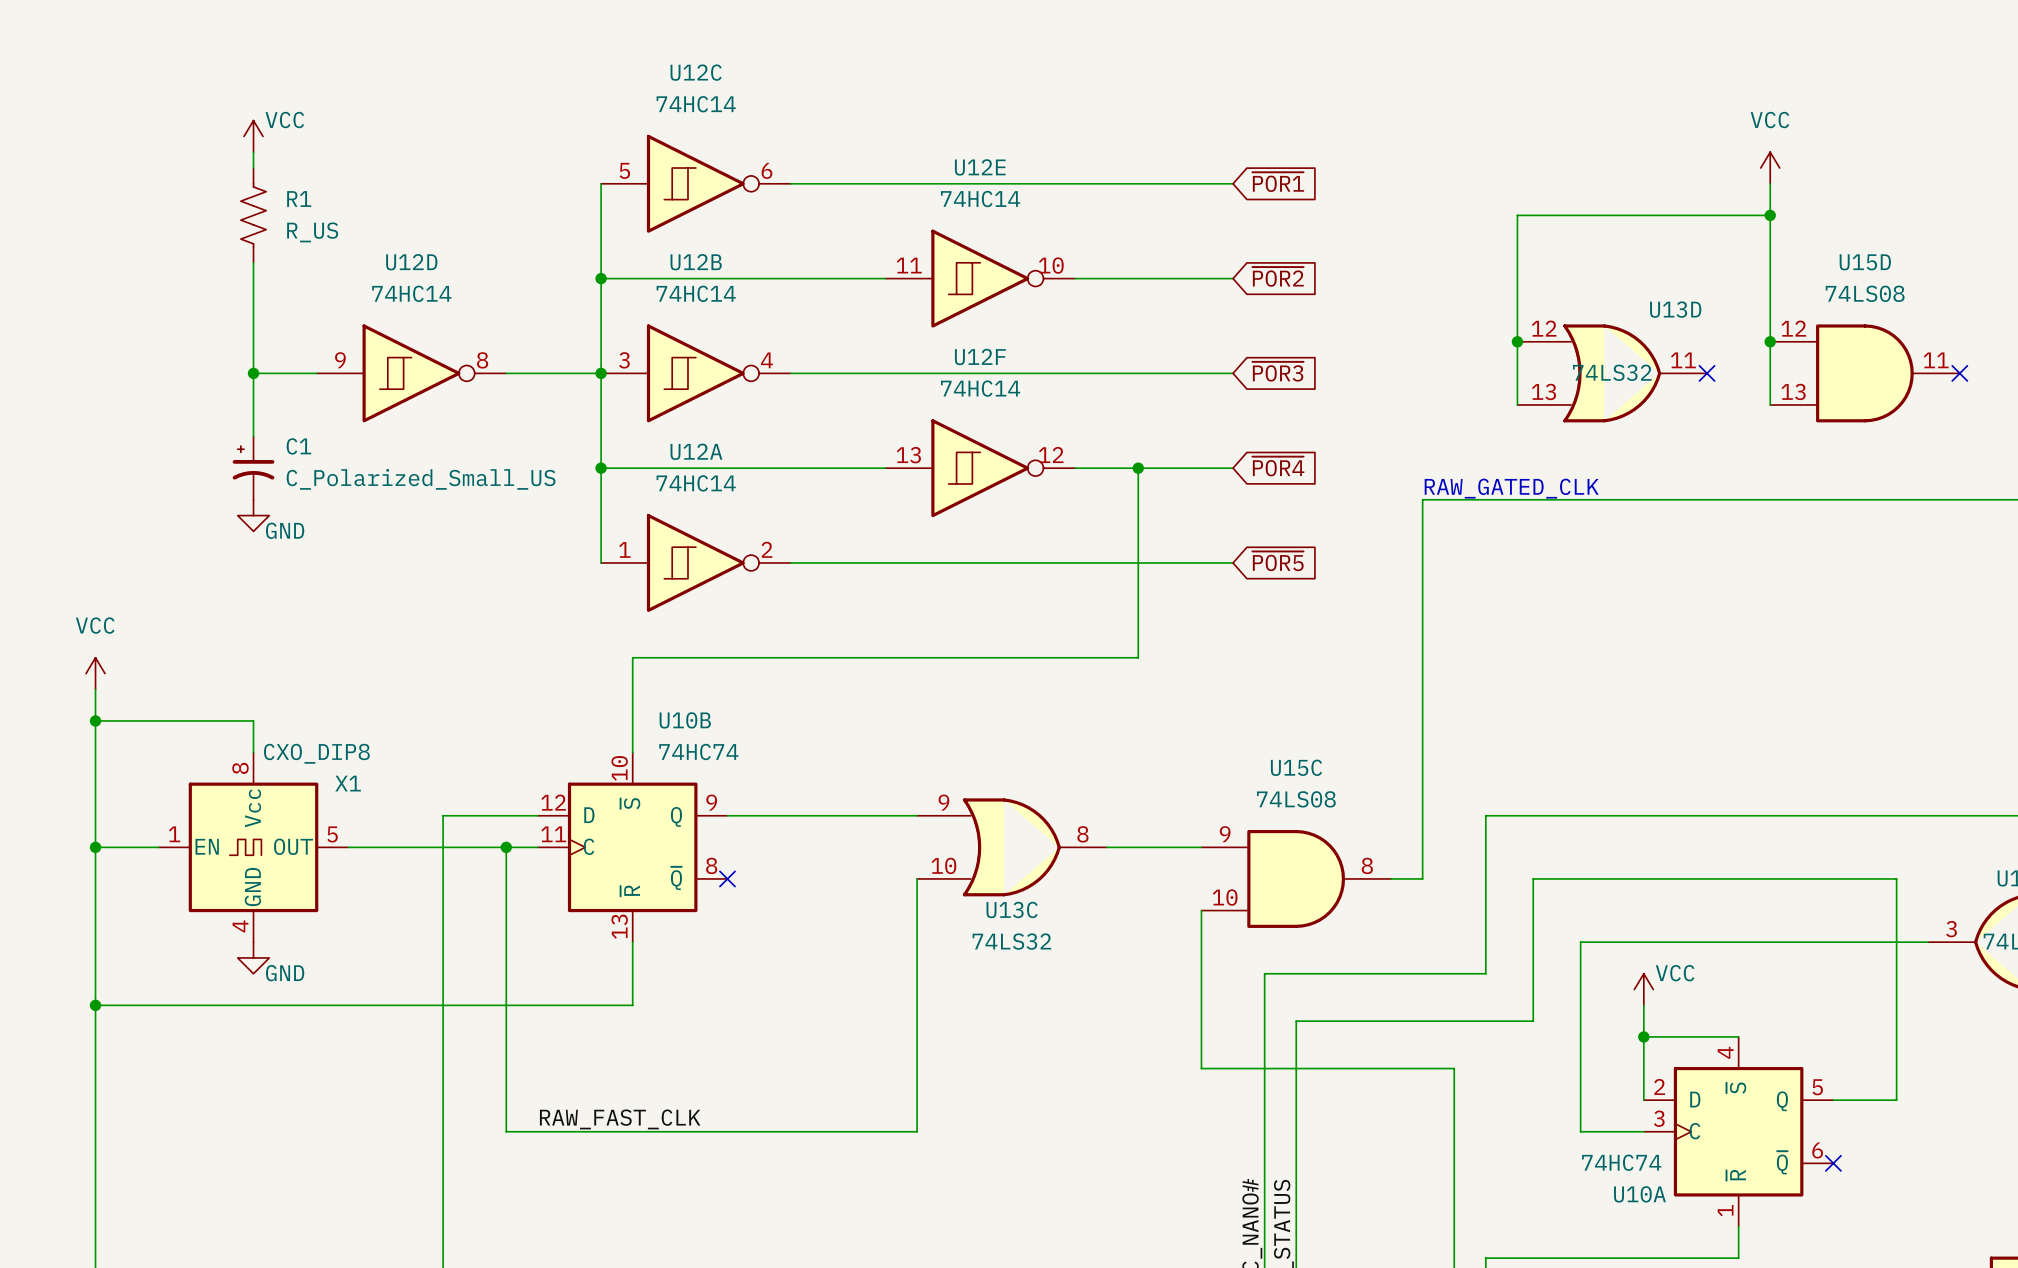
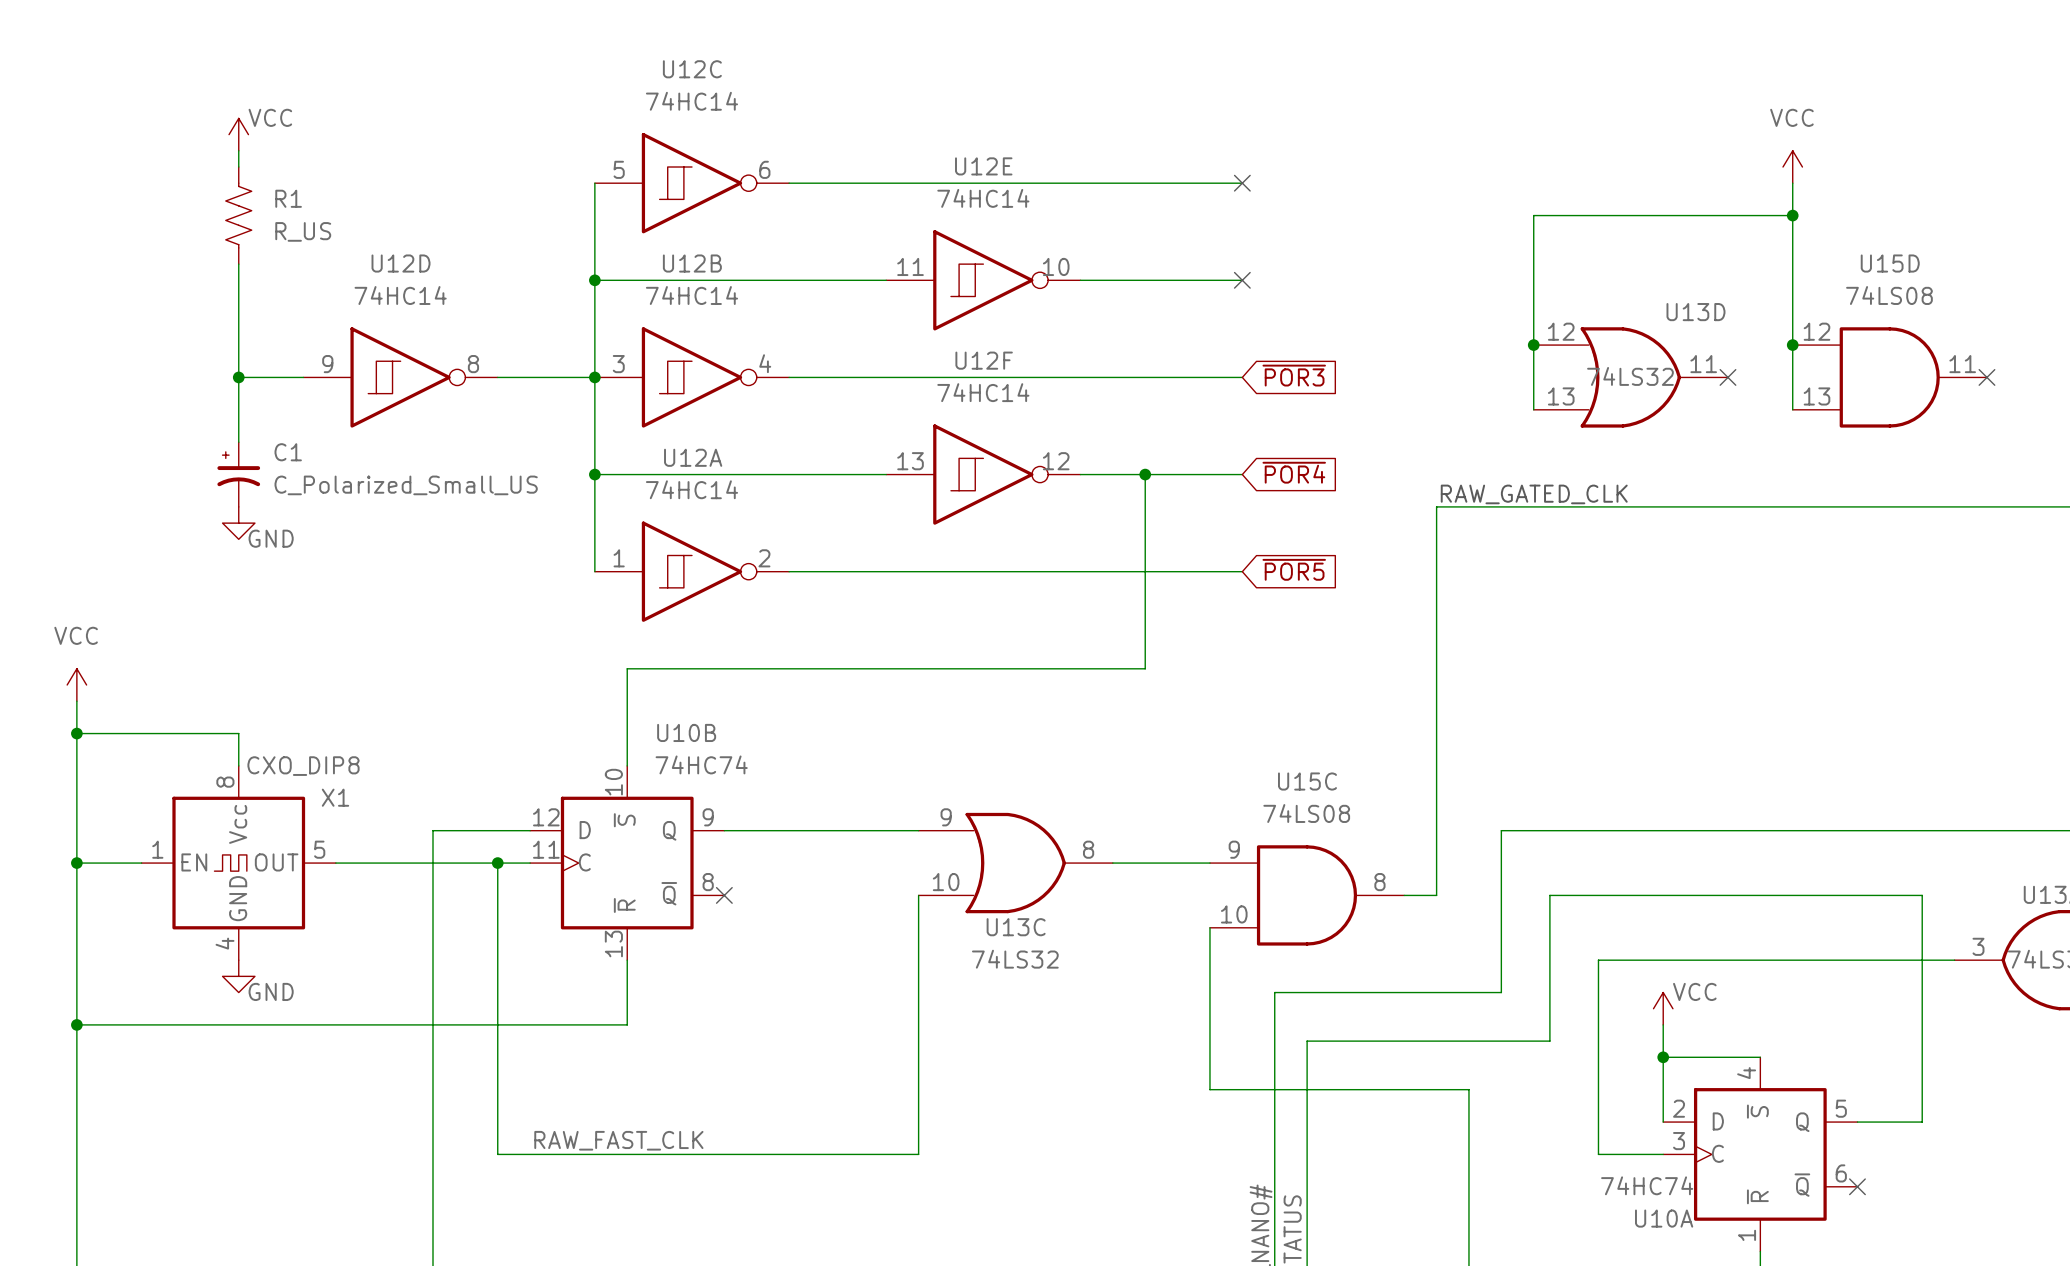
global label: ~{POR1} (1278, 182) -> none
no-connect mark: none -> (1242, 183)
global label: ~{POR2} (1278, 276) -> none
no-connect mark: none -> (1242, 280)

